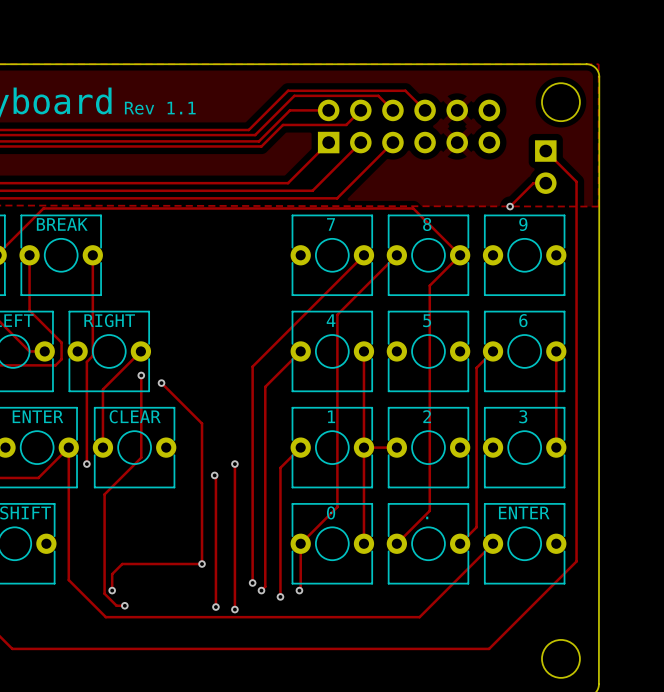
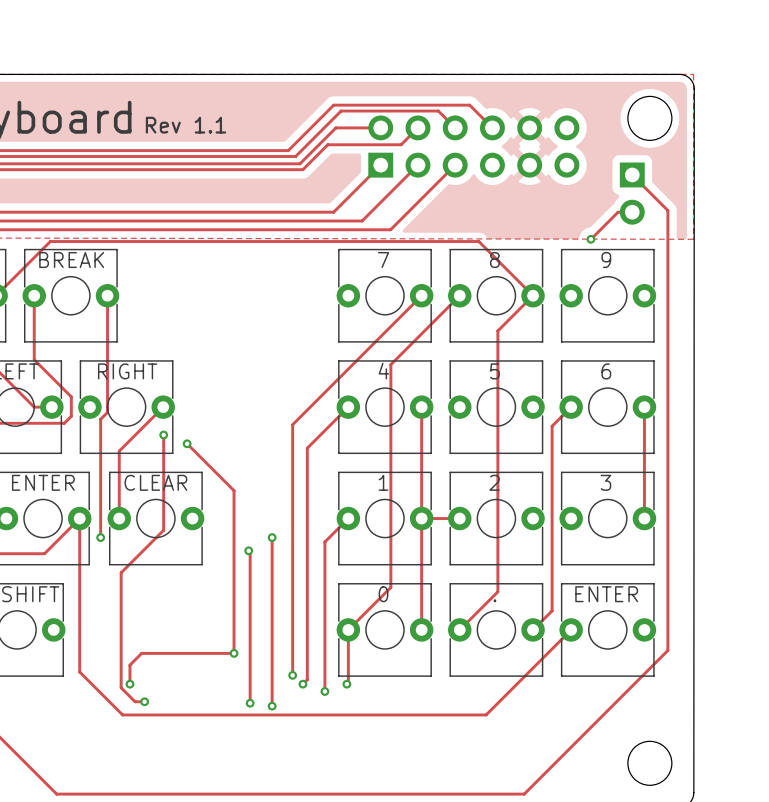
track: (12, 648) (489, 648) -> (14, 751) (56, 794) (524, 794) (566, 751)

